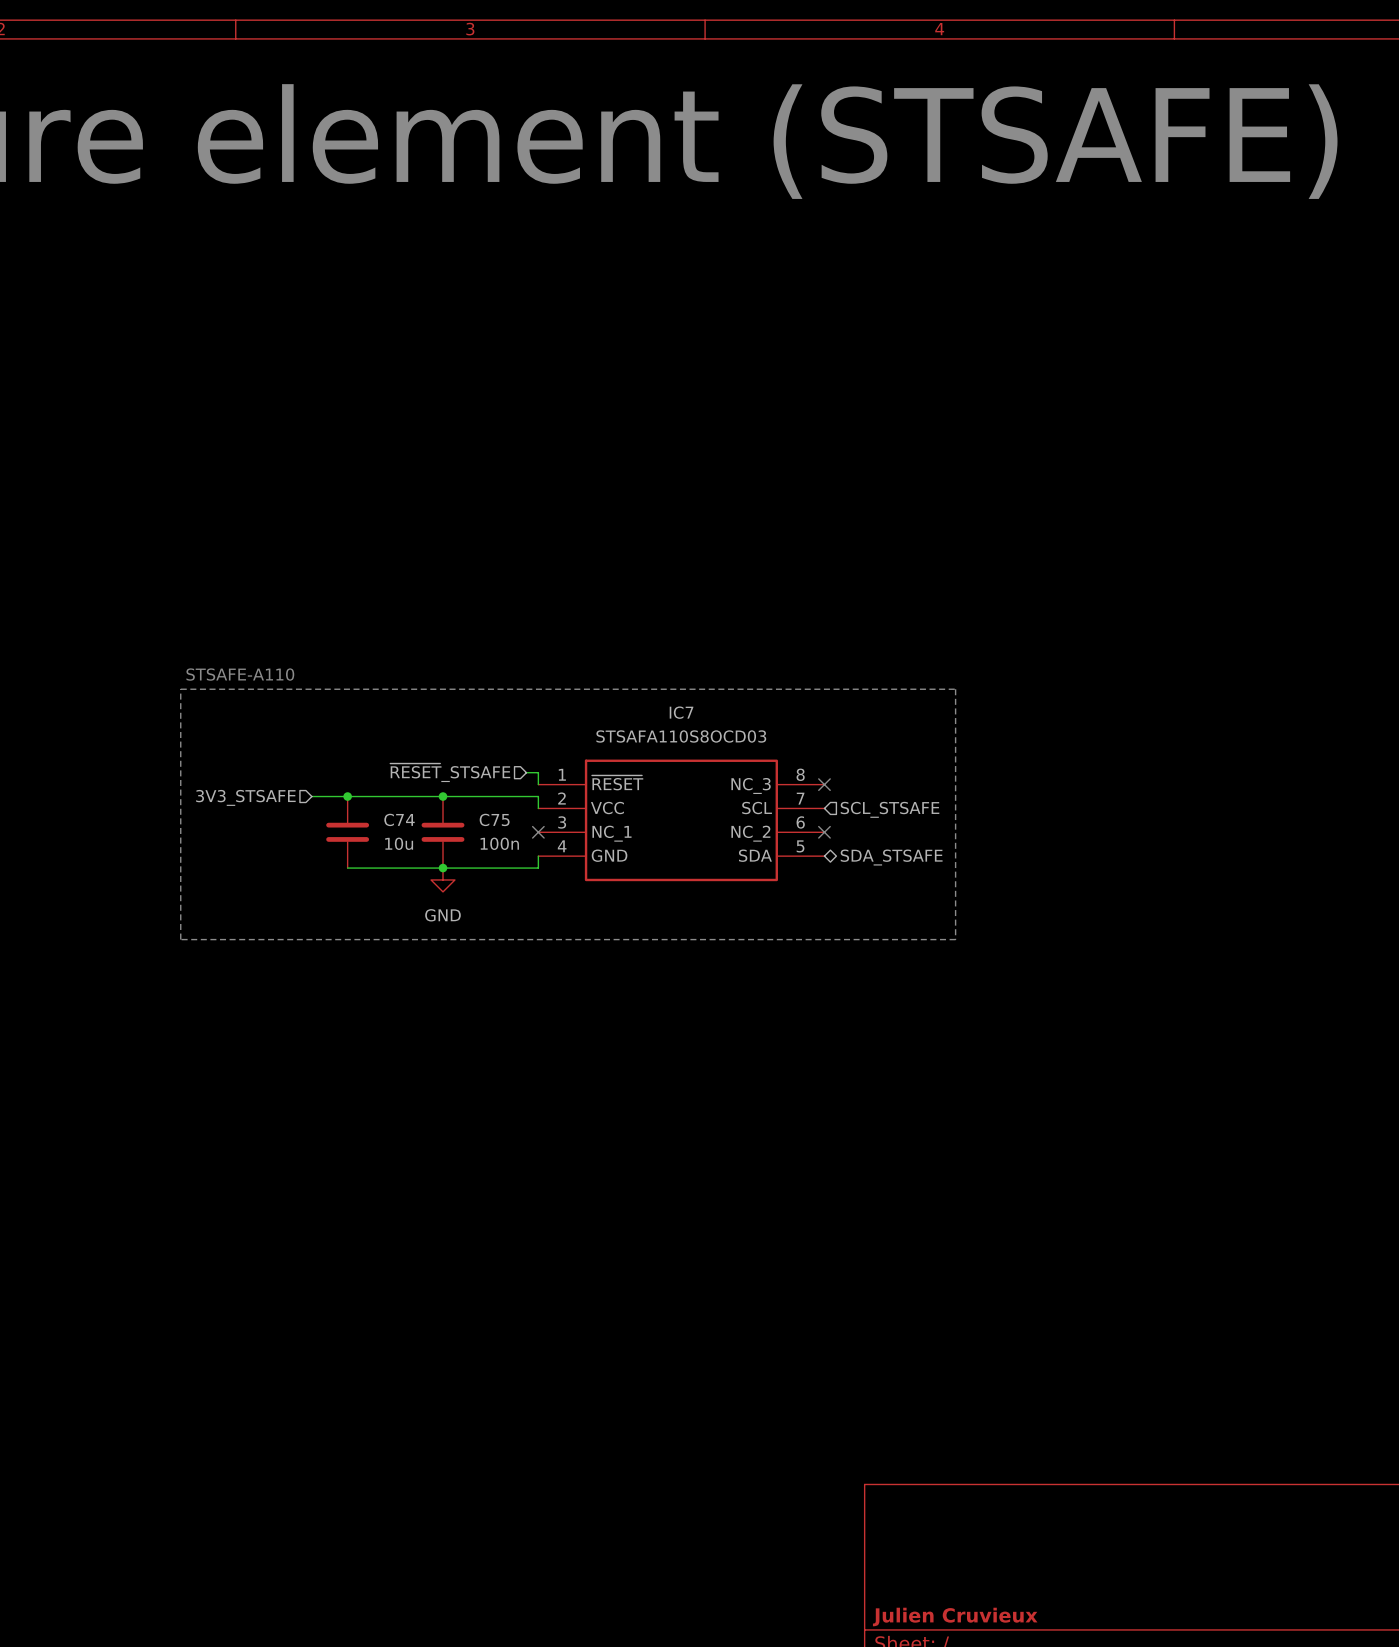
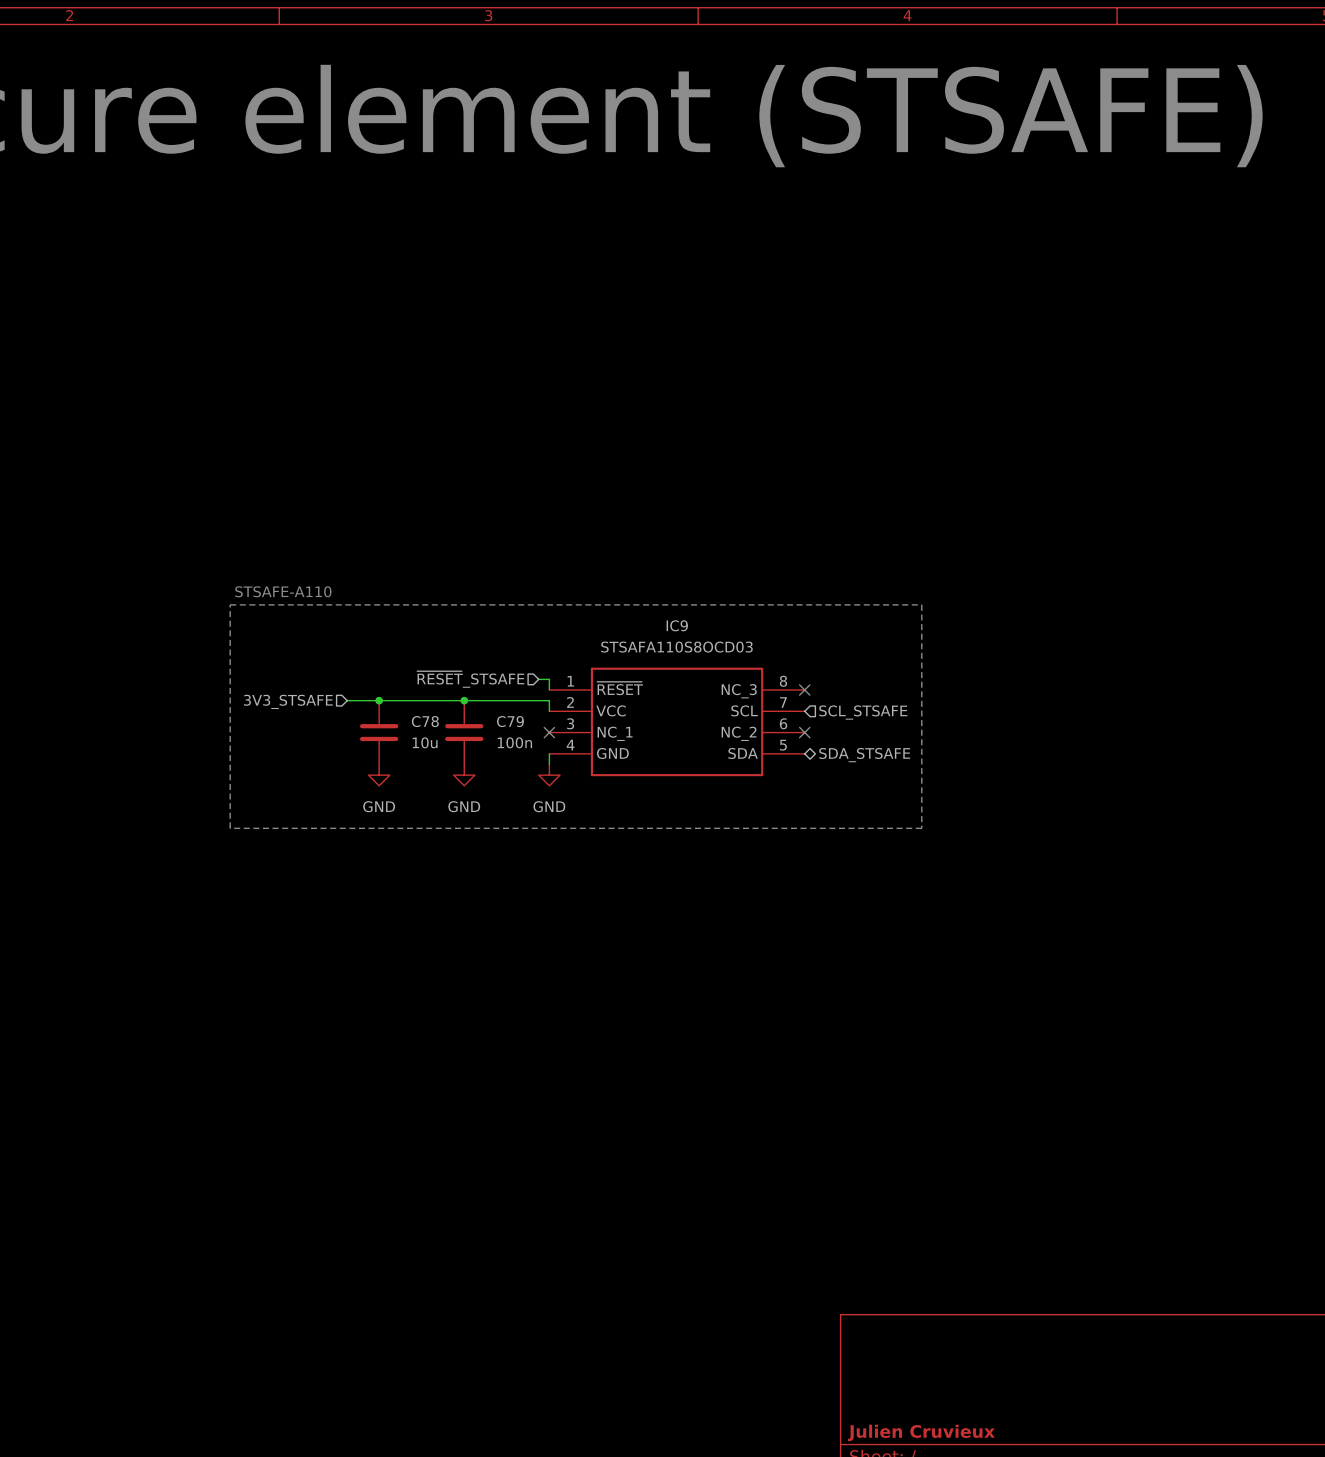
IC7 name: IC7 (681, 712) -> IC9 (677, 625)
C74 name: C74 (399, 819) -> C78 (425, 721)
C75 name: C75 (494, 819) -> C79 (510, 721)
wire: (347, 868) (538, 868) -> none
junction: (443, 868) -> none
power symbol: none -> GND (379, 775)
power symbol: none -> GND (549, 775)

